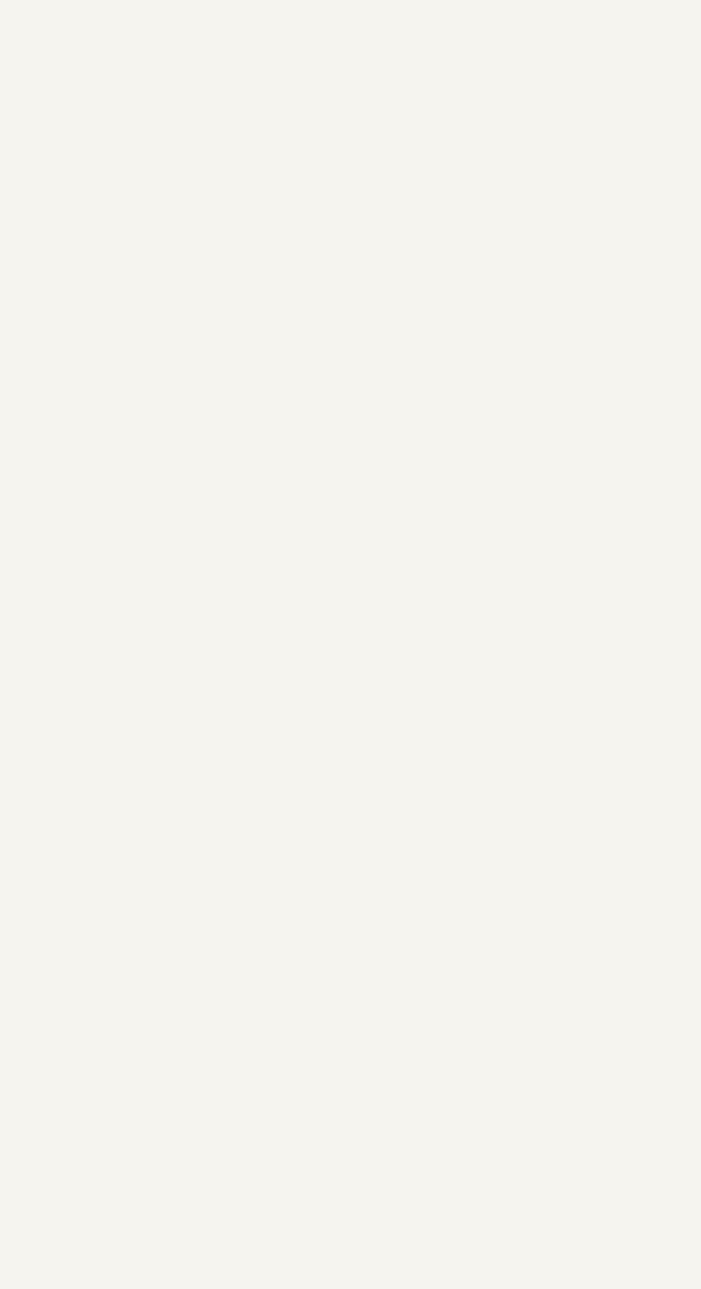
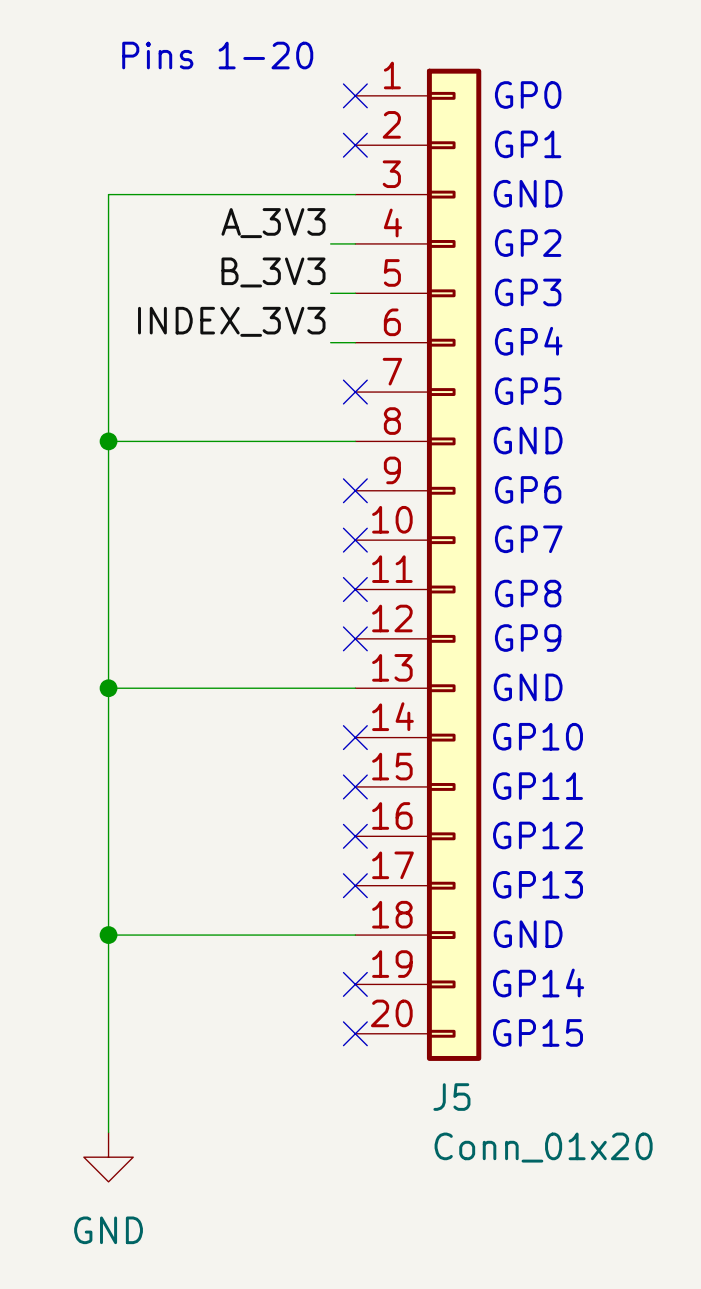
text: none -> Pins 1-20 (217, 55)
no-connect mark: none -> (355, 95)
text: none -> GP0 (528, 95)
text: none -> GP1 (528, 144)
no-connect mark: none -> (355, 145)
text: none -> GND (528, 193)
wire: none -> (355, 194) (108, 194) (108, 1132)
label: none -> A_3V3 (273, 223)
wire: none -> (330, 243) (355, 243)
text: none -> GP2 (528, 243)
label: none -> B_3V3 (273, 272)
text: none -> GP3 (528, 292)
wire: none -> (330, 293) (355, 293)
label: none -> INDEX_3V3 (231, 321)
text: none -> GP4 (528, 341)
wire: none -> (330, 342) (355, 342)
text: none -> GP5 (528, 391)
no-connect mark: none -> (355, 392)
text: none -> GND (528, 440)
wire: none -> (108, 441) (355, 441)
junction: none -> (108, 441)
text: none -> GP6 (528, 489)
no-connect mark: none -> (355, 490)
text: none -> GP7 (528, 539)
no-connect mark: none -> (355, 540)
J5: none -> Conn_01x20 (418, 564)
no-connect mark: none -> (355, 589)
text: none -> GP8 (528, 593)
no-connect mark: none -> (355, 638)
text: none -> GP9 (528, 638)
text: none -> GND (528, 687)
wire: none -> (108, 688) (355, 688)
junction: none -> (108, 688)
text: none -> GP10 (538, 736)
no-connect mark: none -> (355, 737)
no-connect mark: none -> (355, 786)
text: none -> GP11 (538, 786)
text: none -> GP12 (538, 835)
no-connect mark: none -> (355, 836)
text: none -> GP13 (538, 884)
no-connect mark: none -> (355, 885)
text: none -> GND (528, 934)
wire: none -> (108, 935) (355, 935)
junction: none -> (108, 935)
text: none -> GP14 (538, 982)
no-connect mark: none -> (355, 984)
text: none -> GP15 (538, 1032)
no-connect mark: none -> (355, 1033)
power symbol: none -> GND (108, 1157)

